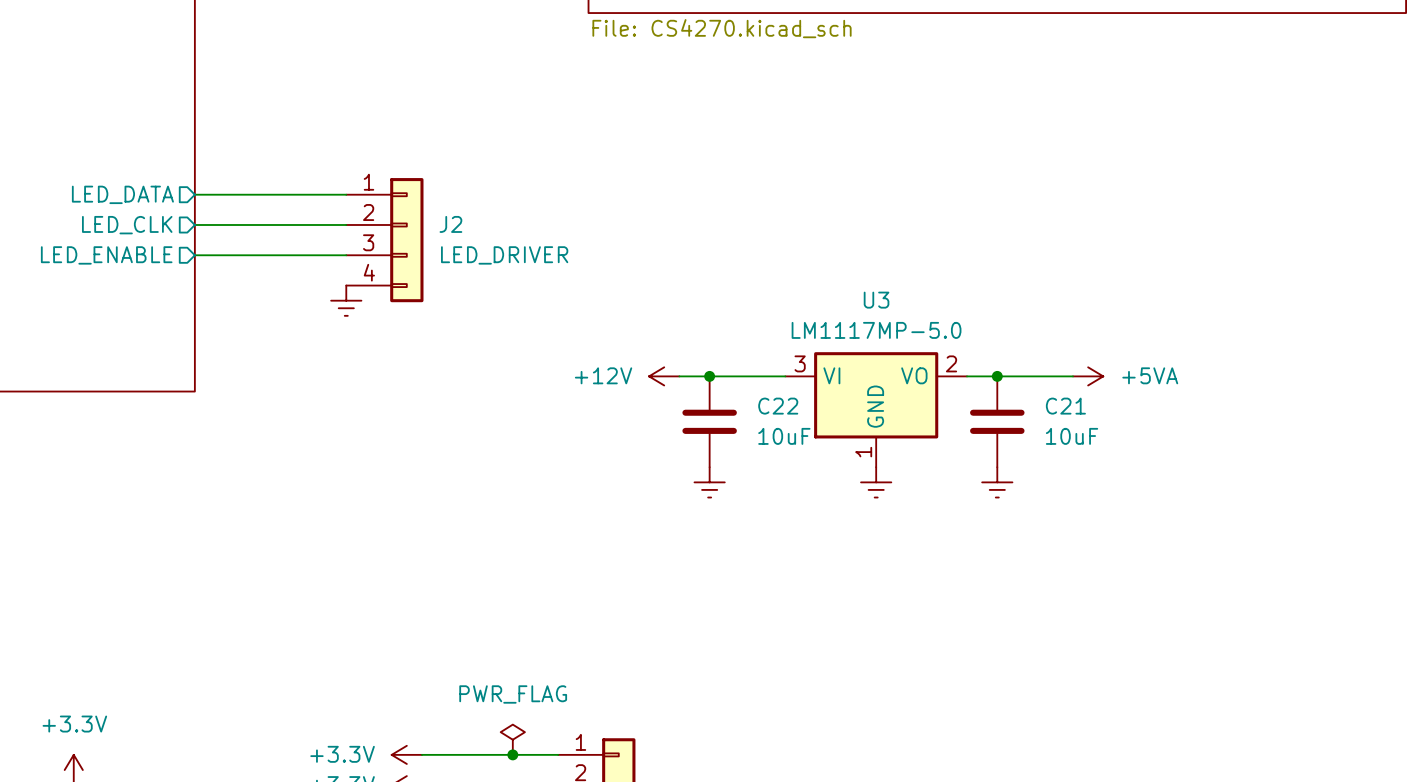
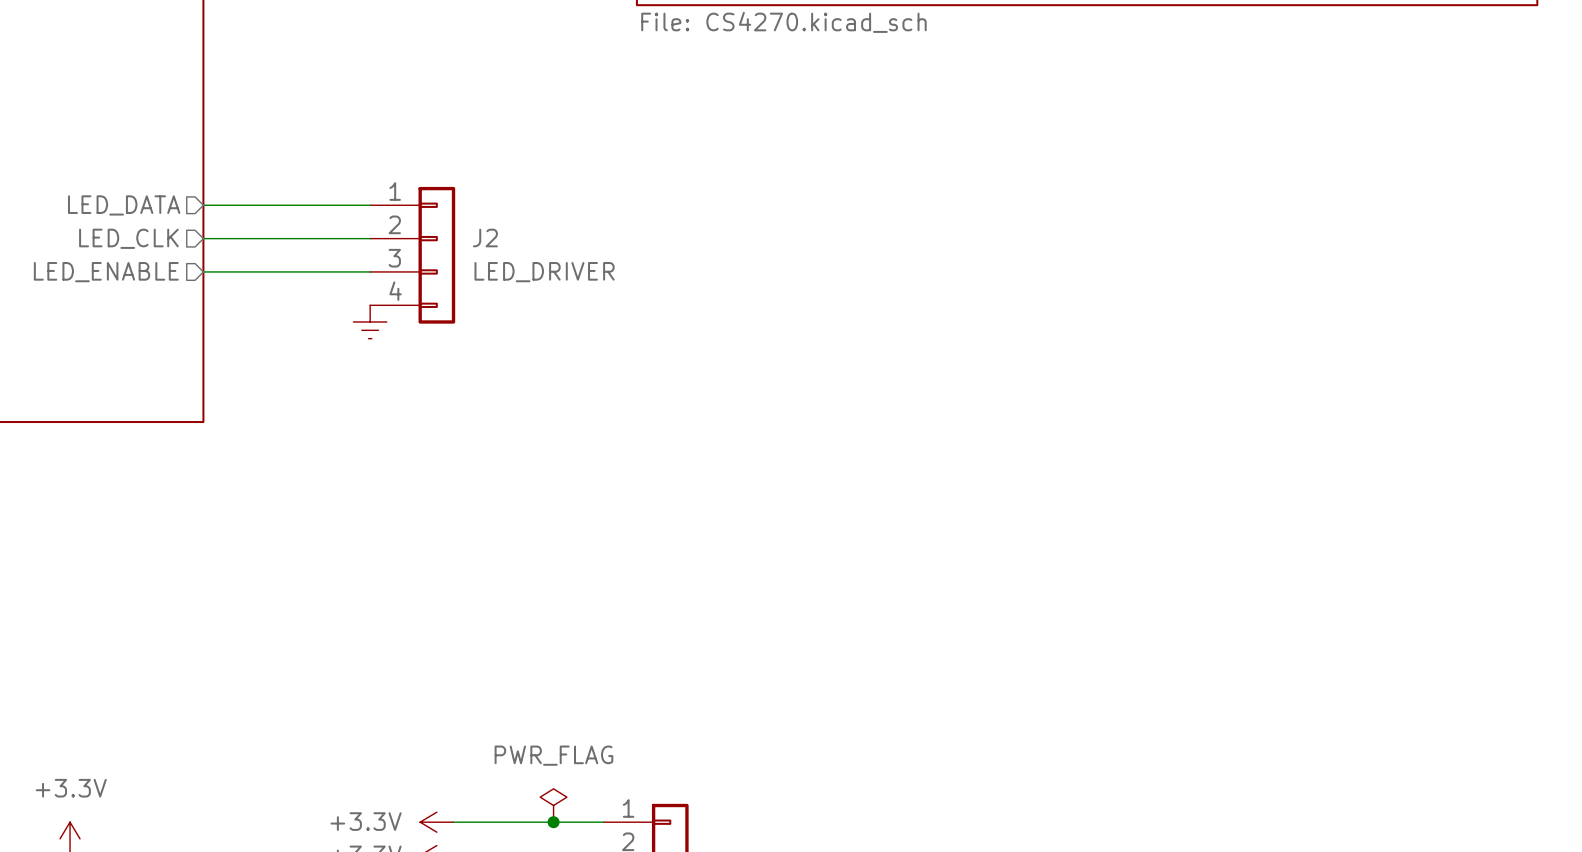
power symbol: +12V (664, 376) -> none
wire: (679, 376) (785, 376) -> none
junction: (709, 376) -> none
wire: (967, 376) (1073, 376) -> none
junction: (997, 376) -> none
power symbol: +5VA (1088, 376) -> none
U3: LM1117MP-5.0 (876, 409) -> none
C22: 10uF (709, 421) -> none
C21: 10uF (997, 421) -> none
power symbol: (709, 482) -> none
power symbol: (876, 482) -> none
power symbol: (997, 482) -> none

